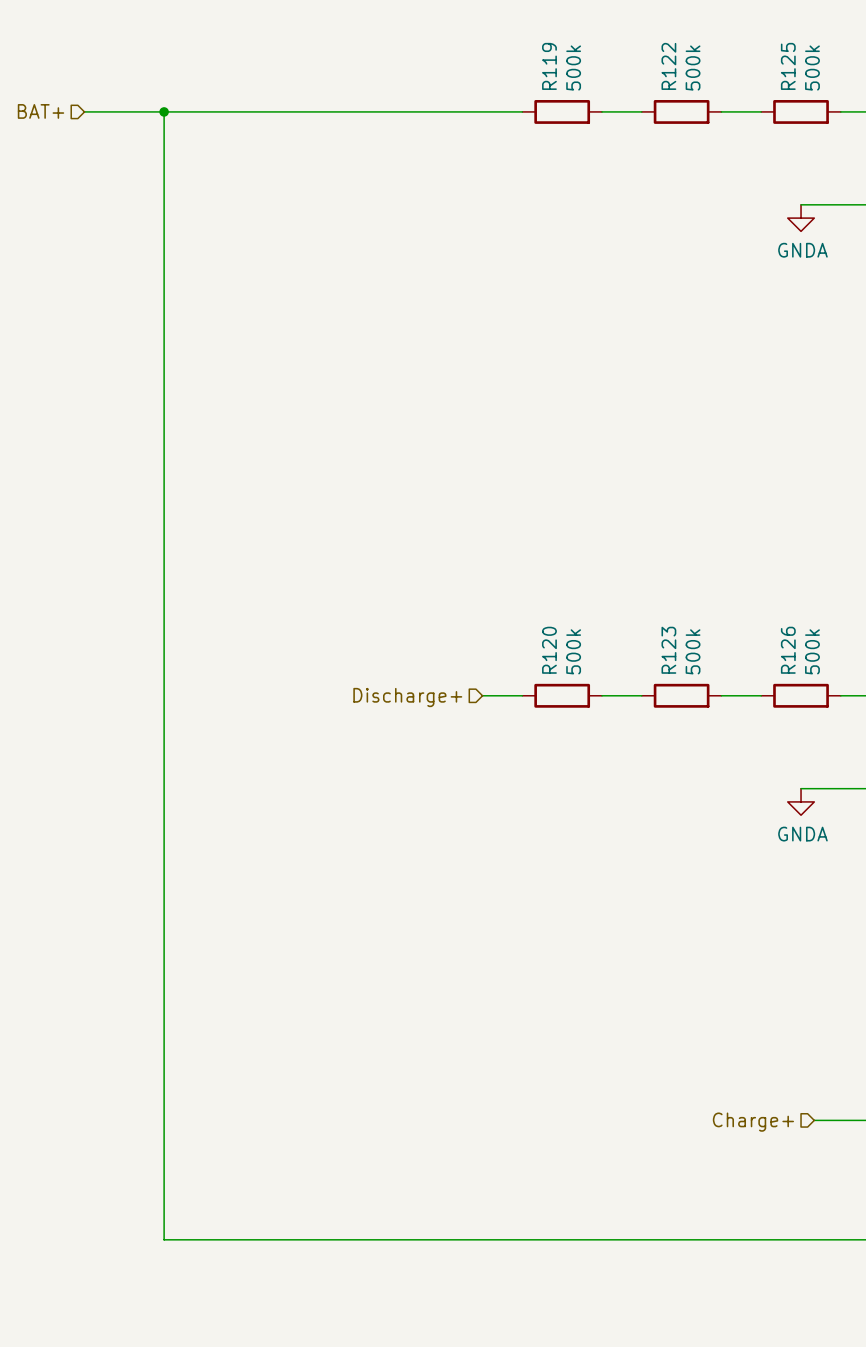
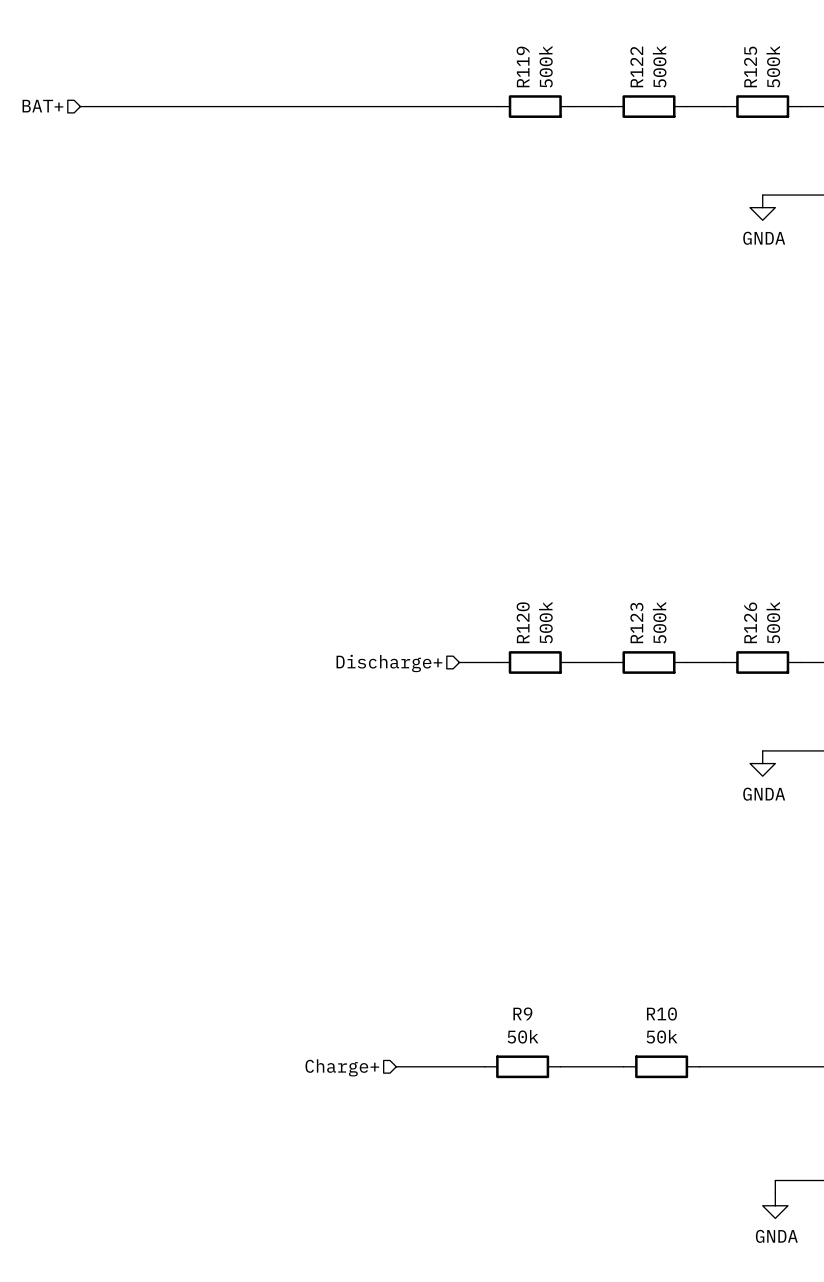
wire: (164, 111) (164, 1239) (814, 1239) -> (775, 1193) (775, 1180)
junction: (164, 111) -> none
wire: none -> (396, 1066) (484, 1066)
R9: none -> 50k (522, 1066)
wire: none -> (560, 1066) (623, 1066)
R10: none -> 50k (661, 1066)
wire: none -> (699, 1066) (775, 1066)
hierarchical label: none -> Charge+ (342, 1067)
hierarchical label: Charge+ (753, 1122) -> none
power symbol: none -> GNDA (775, 1205)

